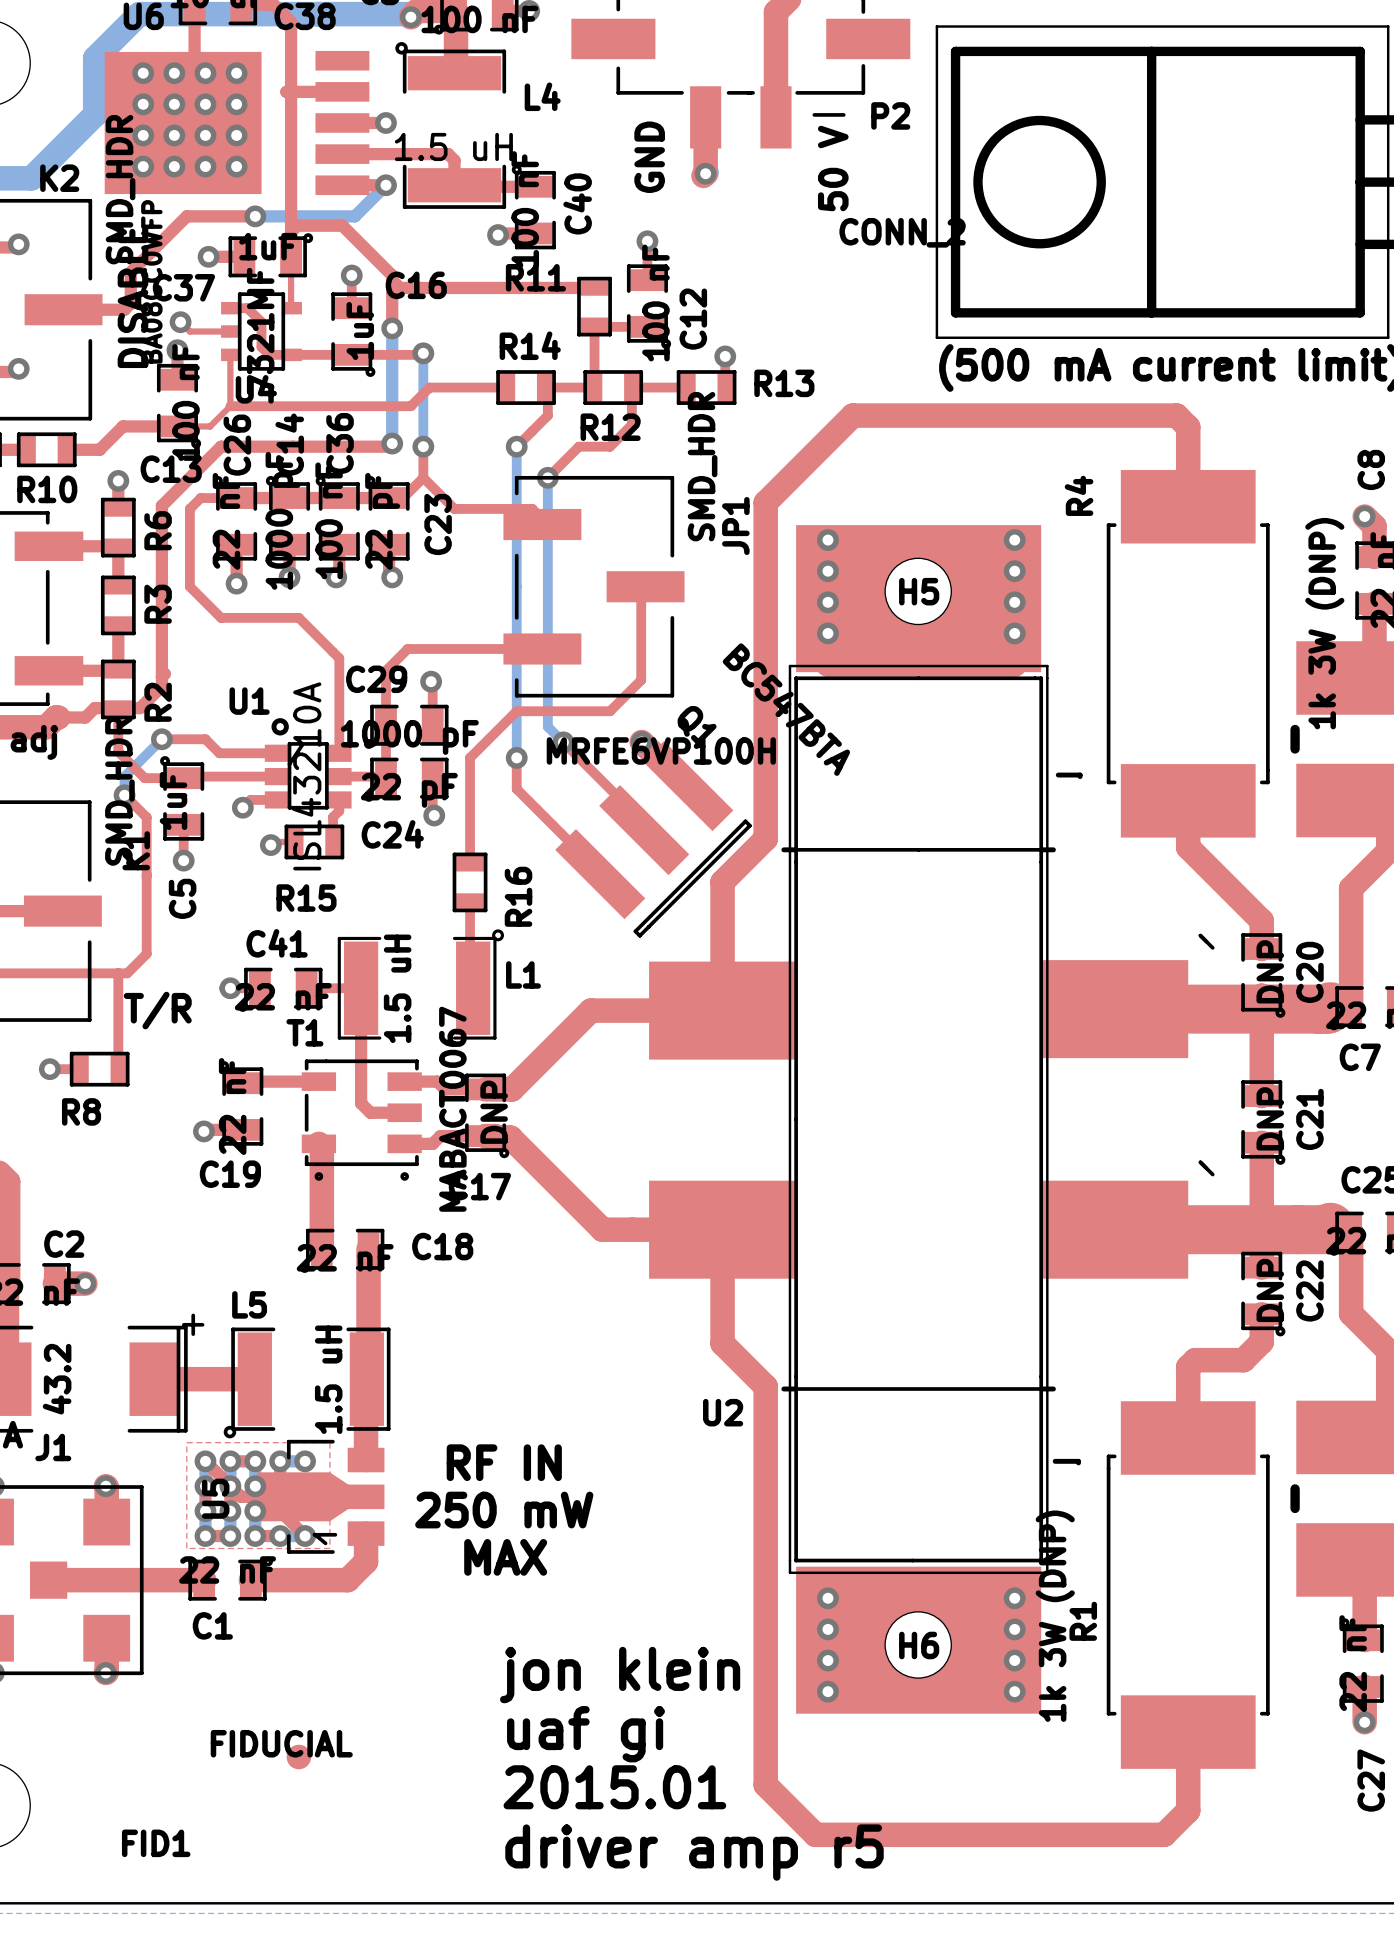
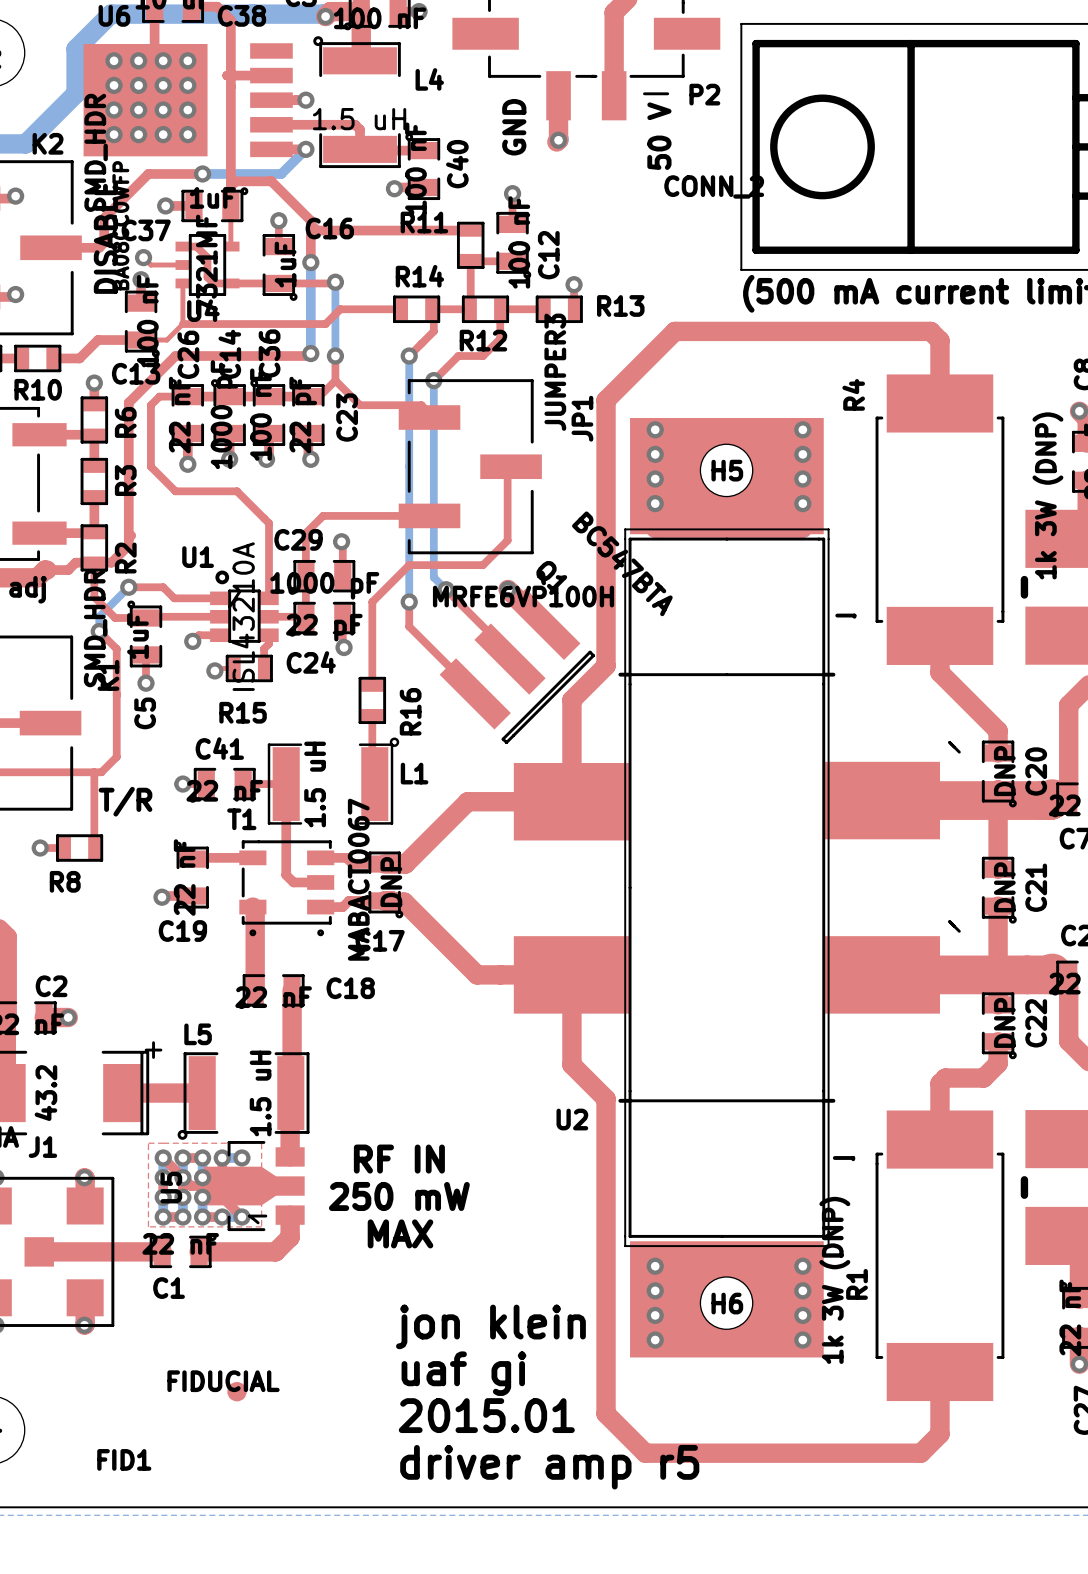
JP1 value: SMD_HDR (702, 466) -> JUMPER3 (555, 372)

